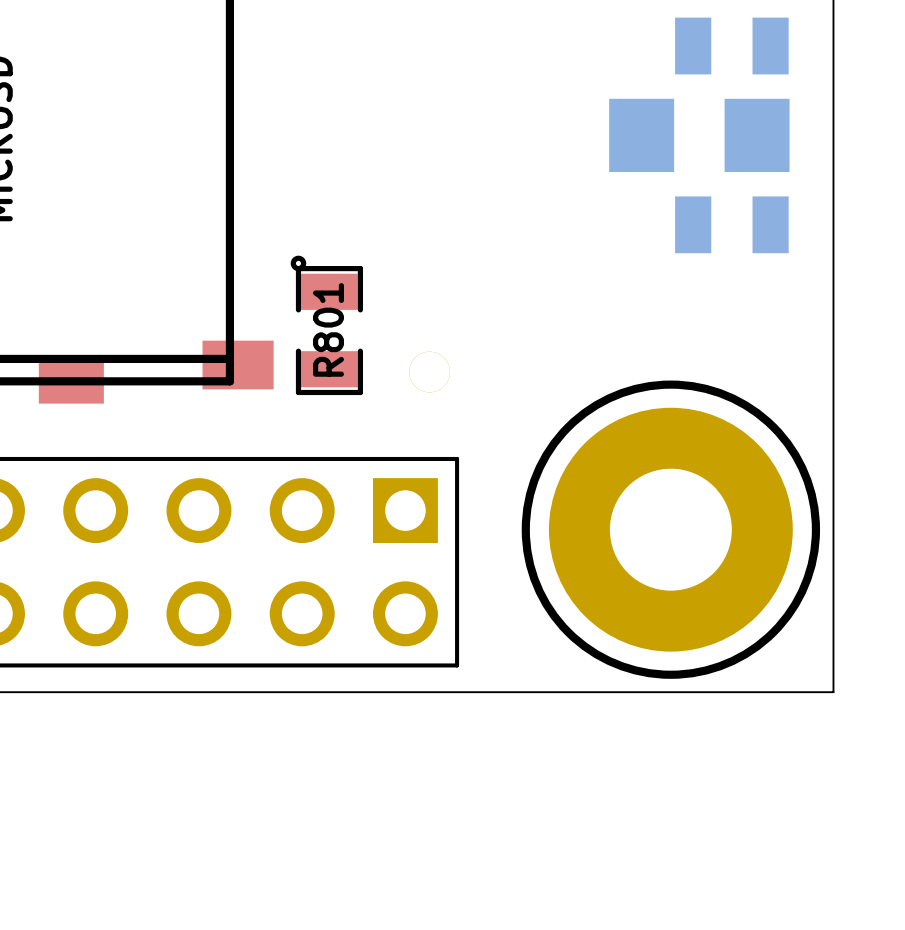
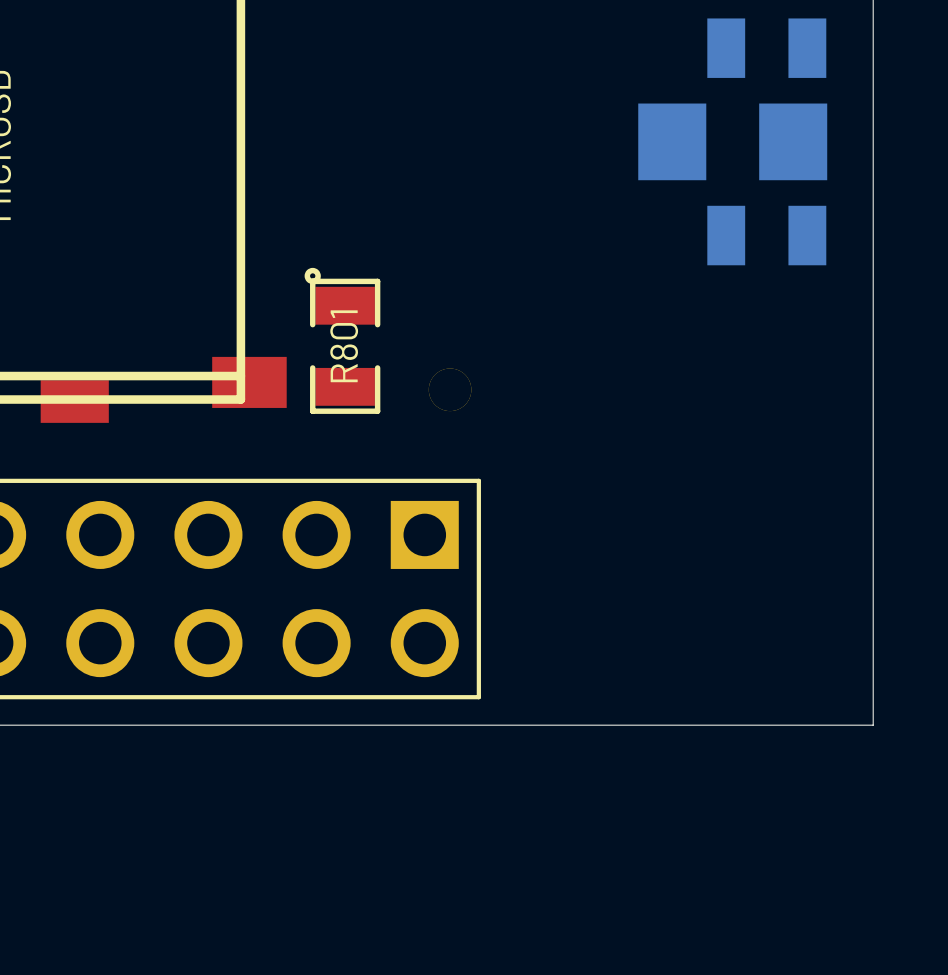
part: (670, 529) -> none

